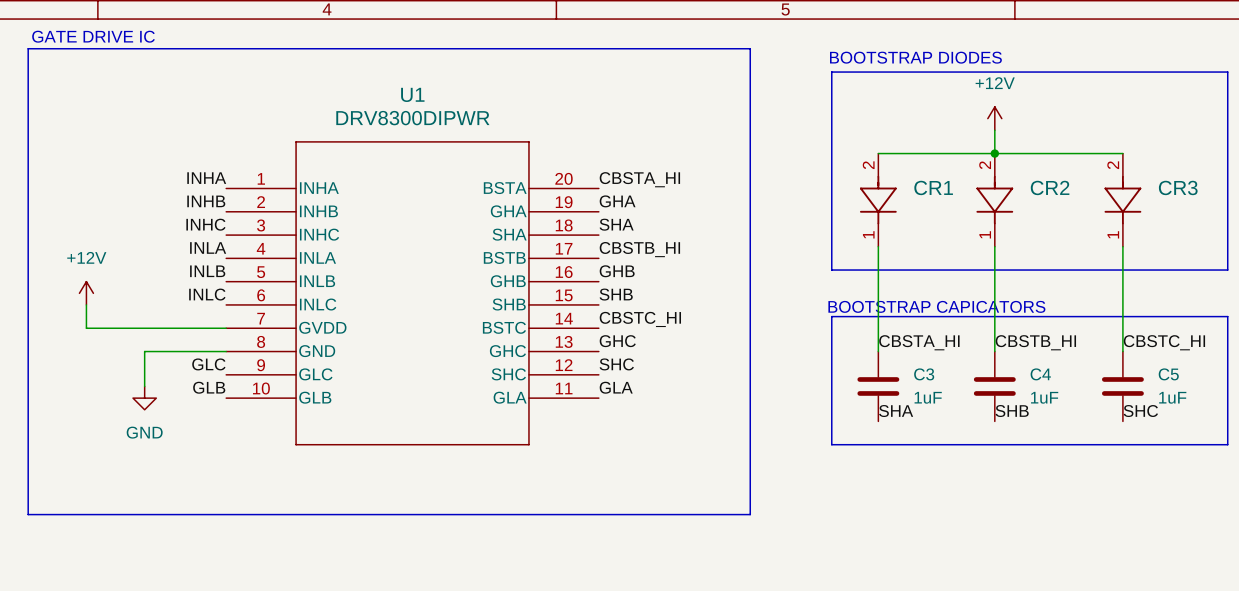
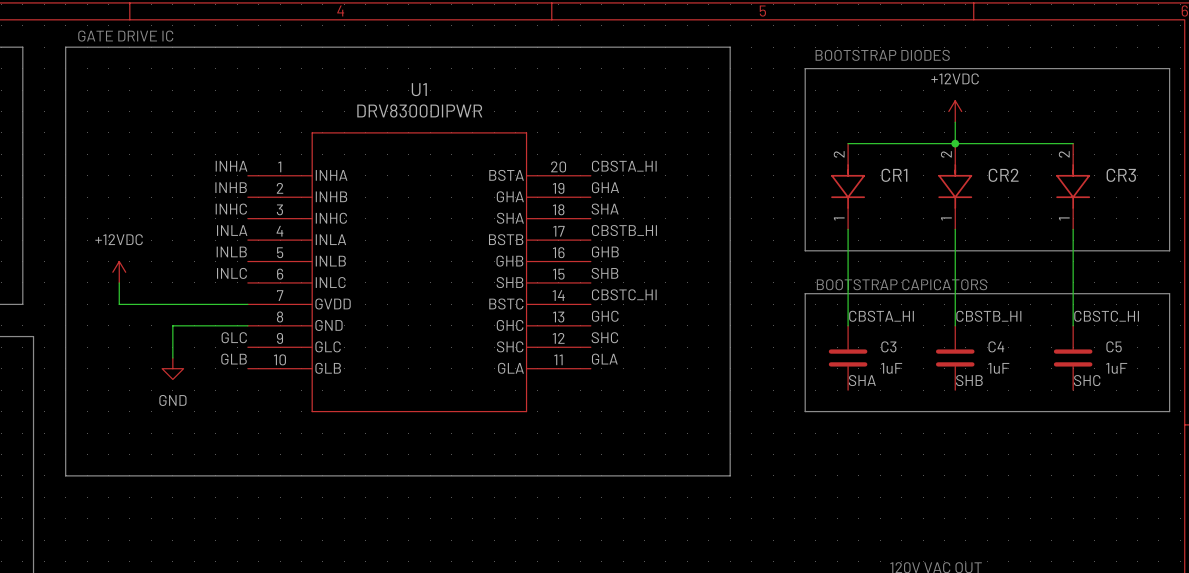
power symbol: +12V (994, 118) -> +12VDC (955, 111)
power symbol: +12V (86, 293) -> +12VDC (119, 272)

